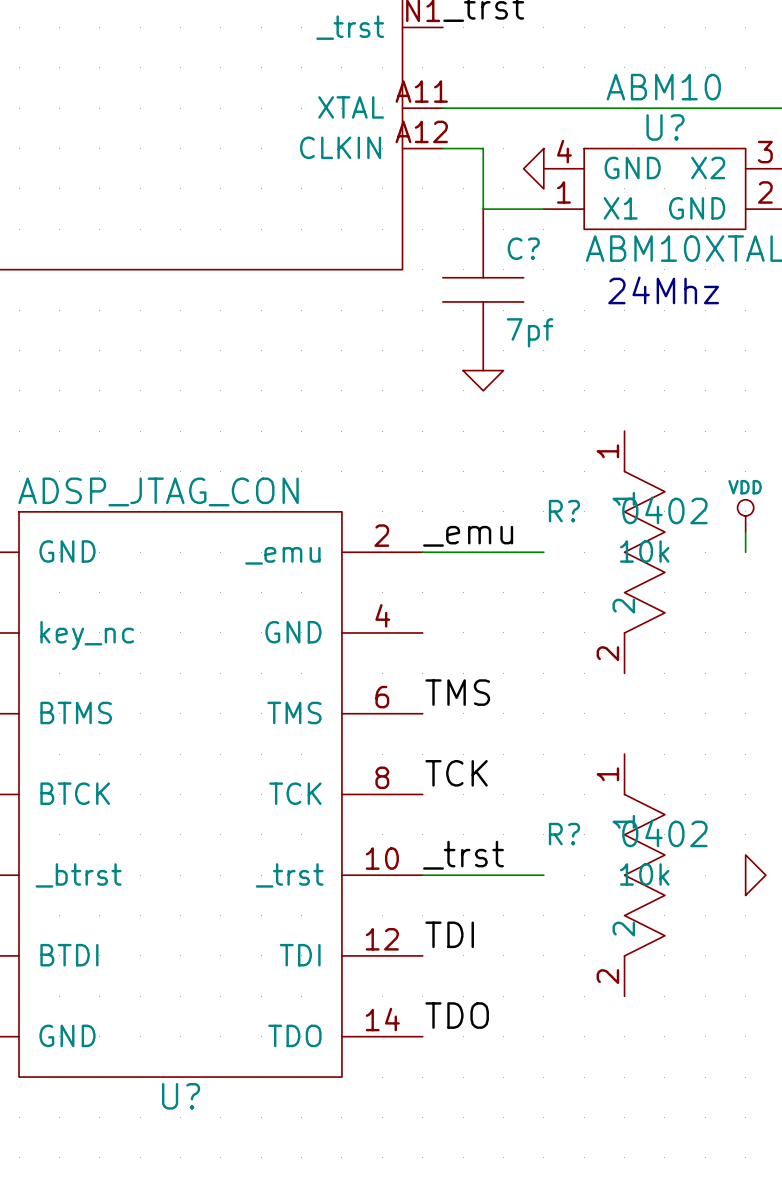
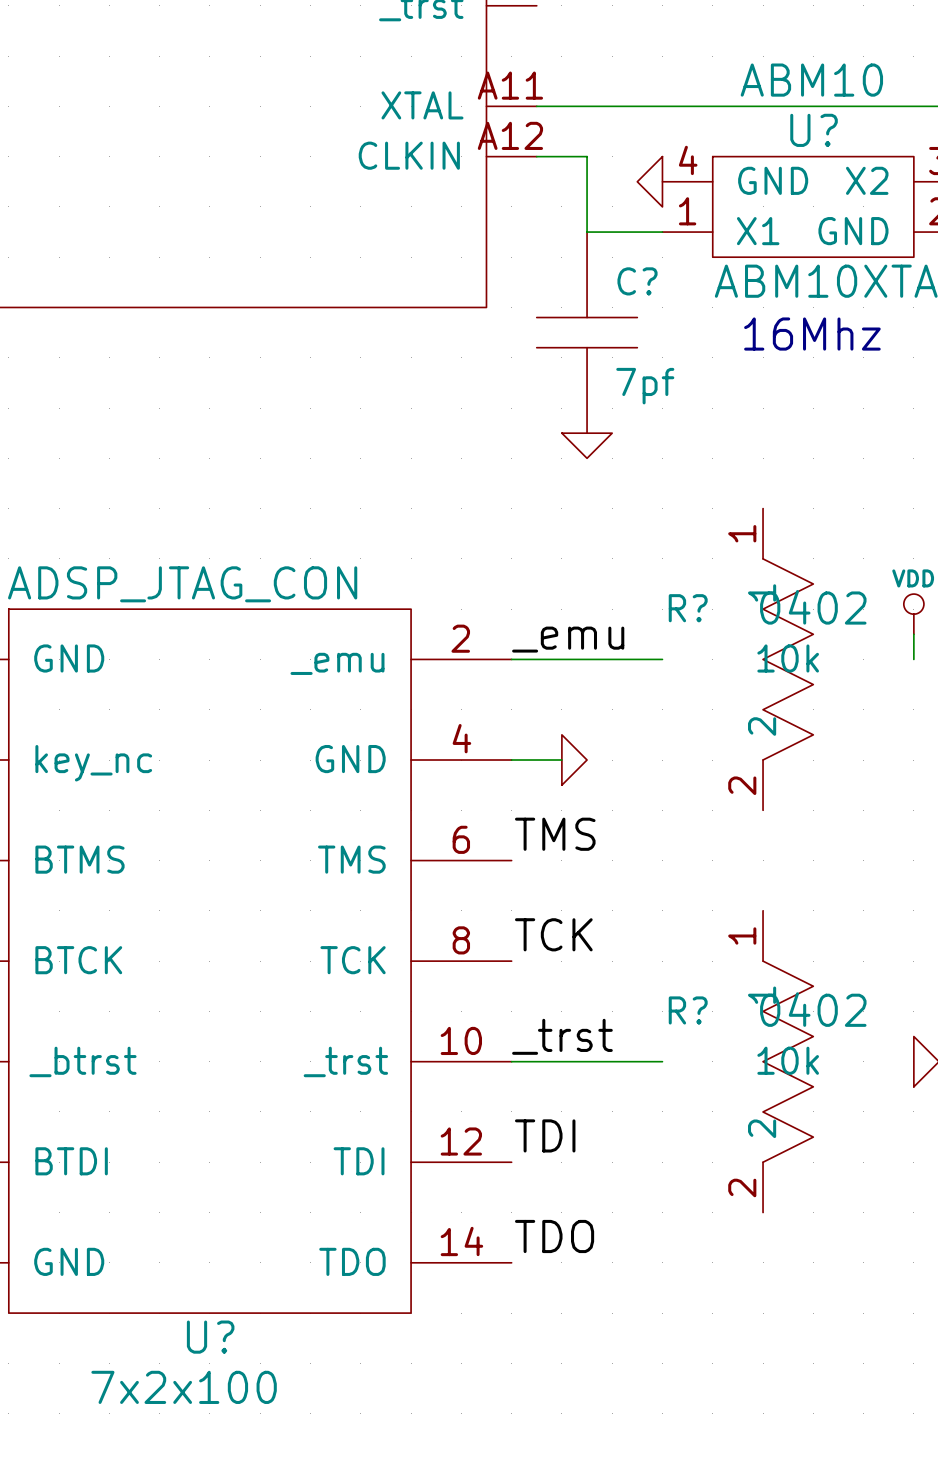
text: 24Mhz (663, 290) -> 16Mhz (812, 334)
wire: none -> (511, 760) (561, 760)
power symbol: none -> (574, 760)
U? text: none -> 7x2x100 (184, 1387)

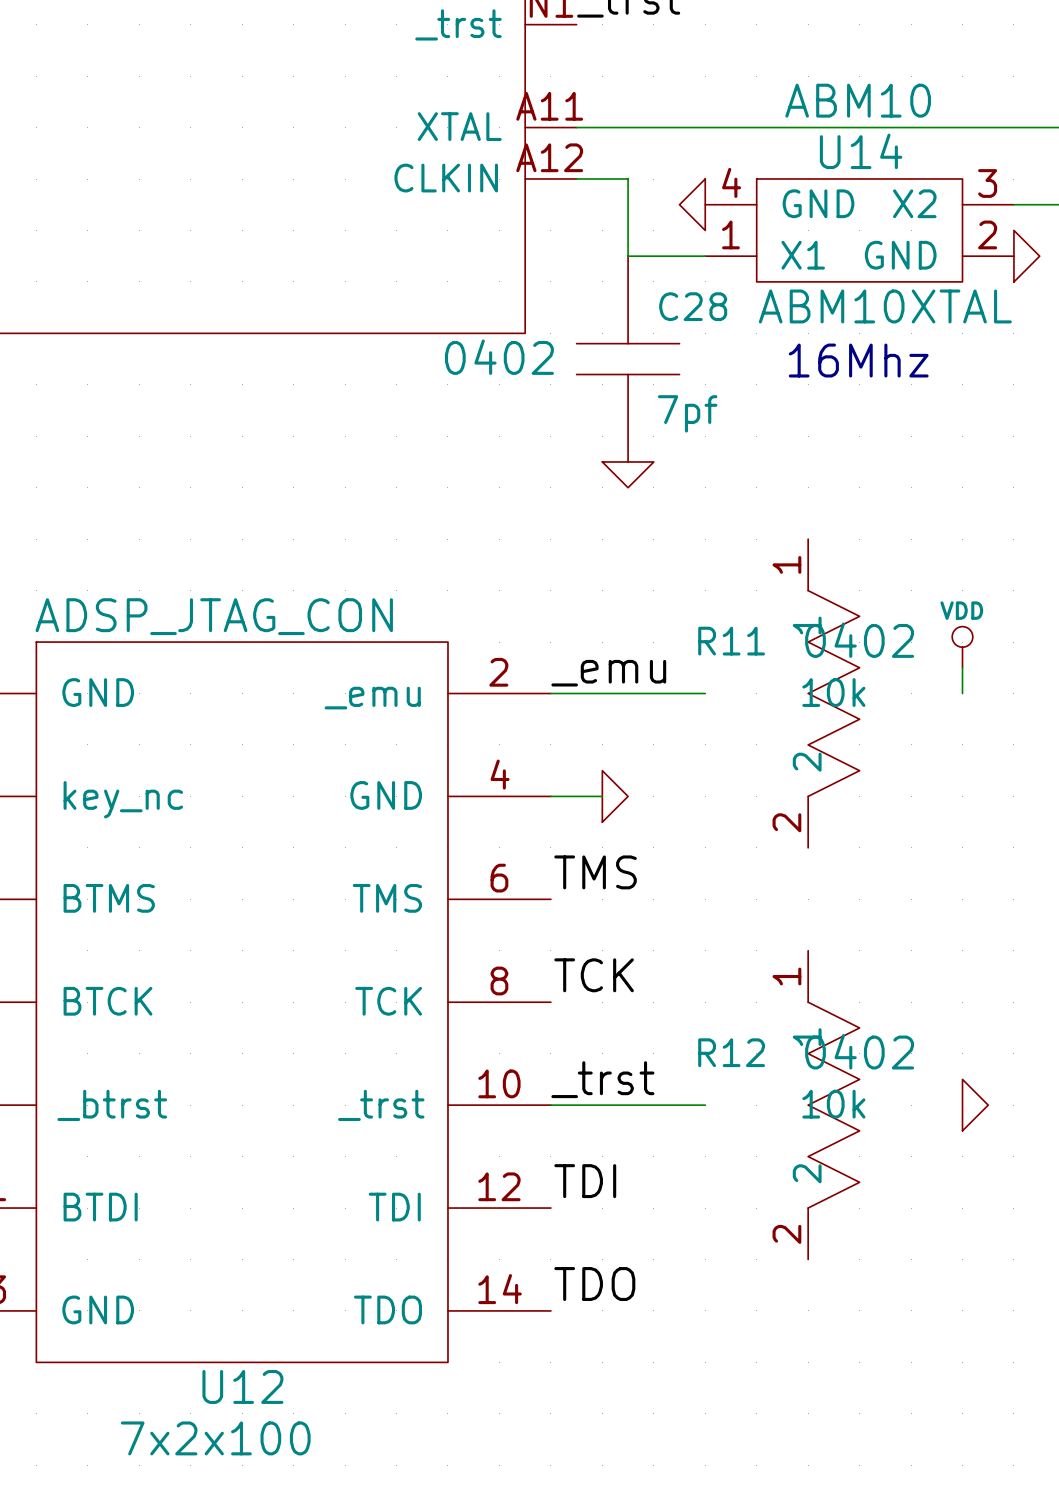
U? name: U? (814, 130) -> U14 (861, 151)
C? name: C? (637, 281) -> C28 (693, 306)
C? text: none -> 0402 (499, 357)
R? name: R? (688, 608) -> R11 (731, 641)
R? name: R? (688, 1010) -> R12 (731, 1052)
U? name: U? (210, 1337) -> U12 (242, 1386)

